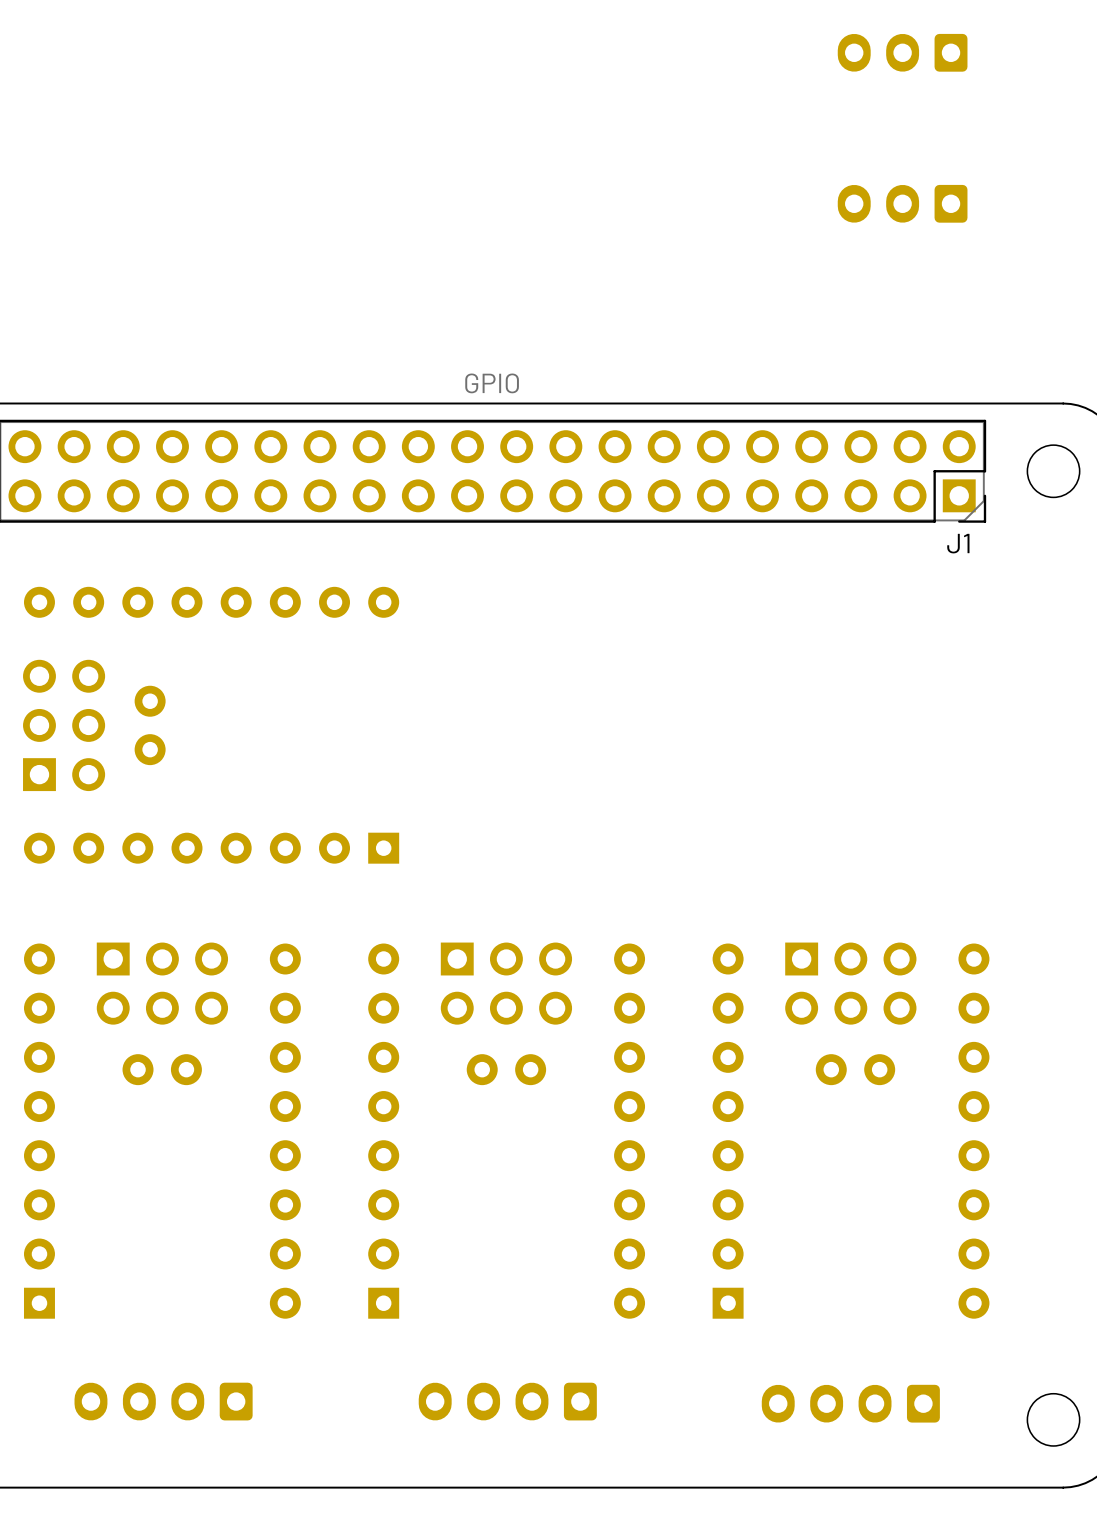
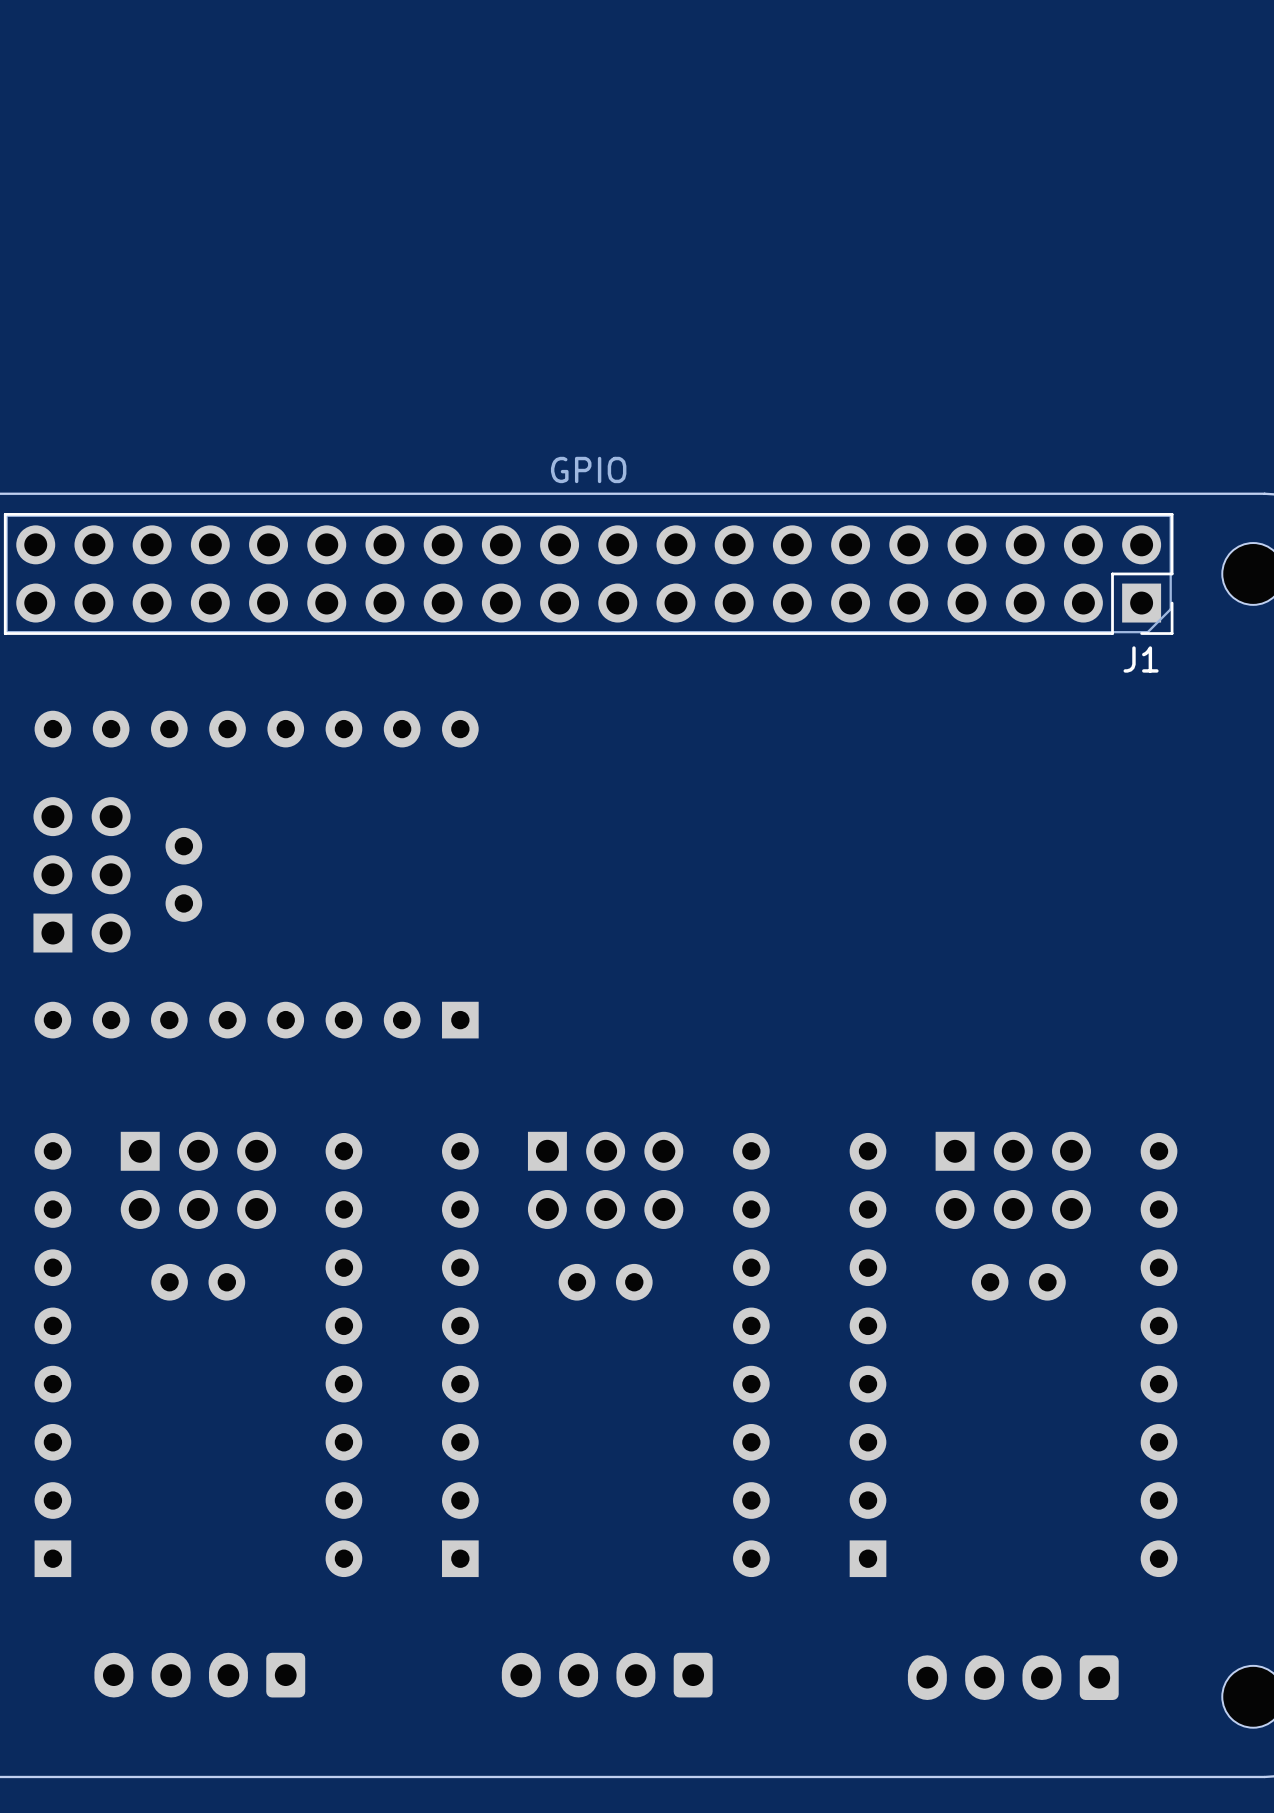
part: (902, 52) -> none
part: (902, 203) -> none

